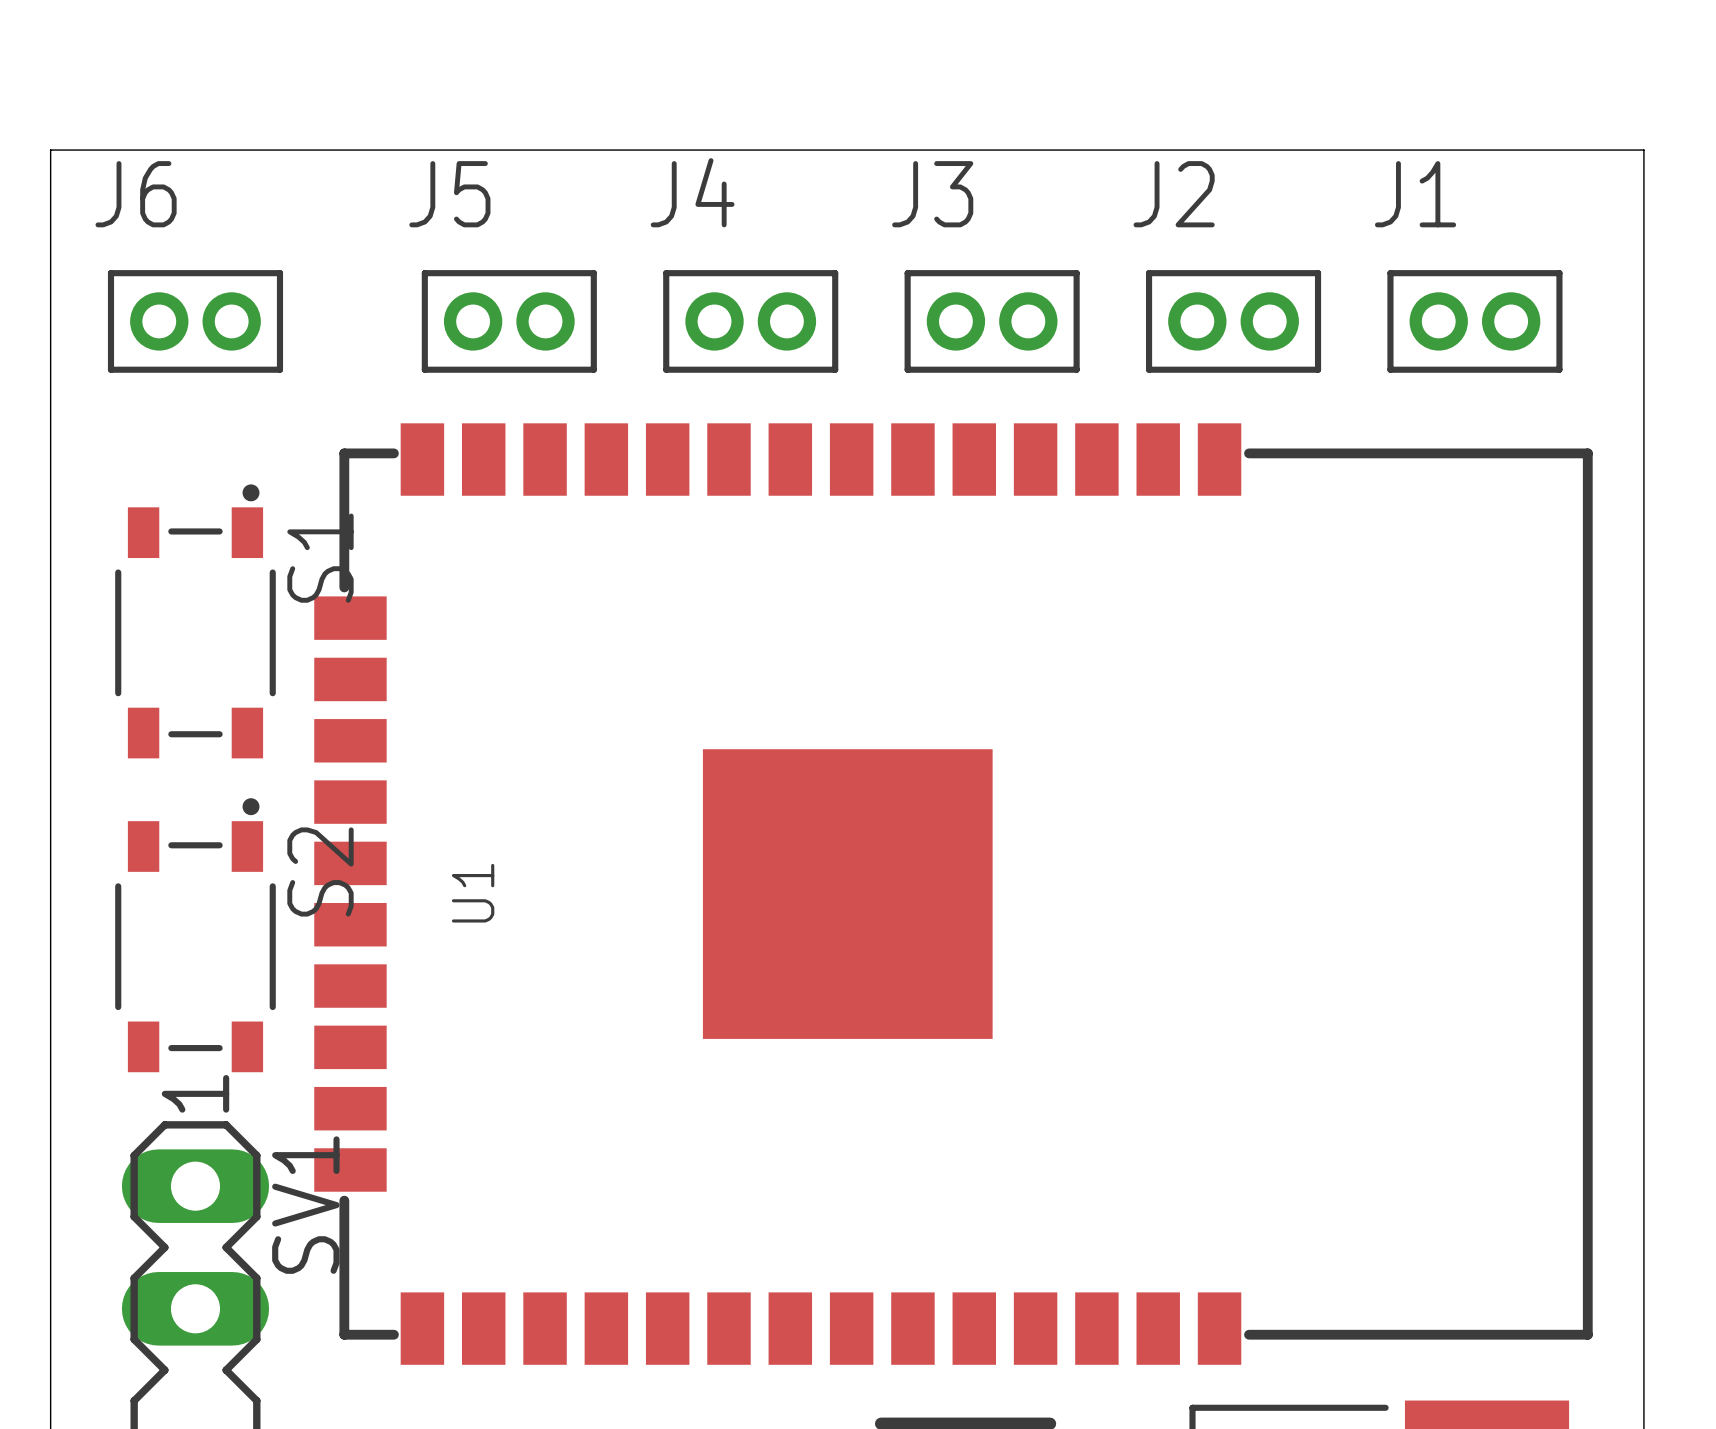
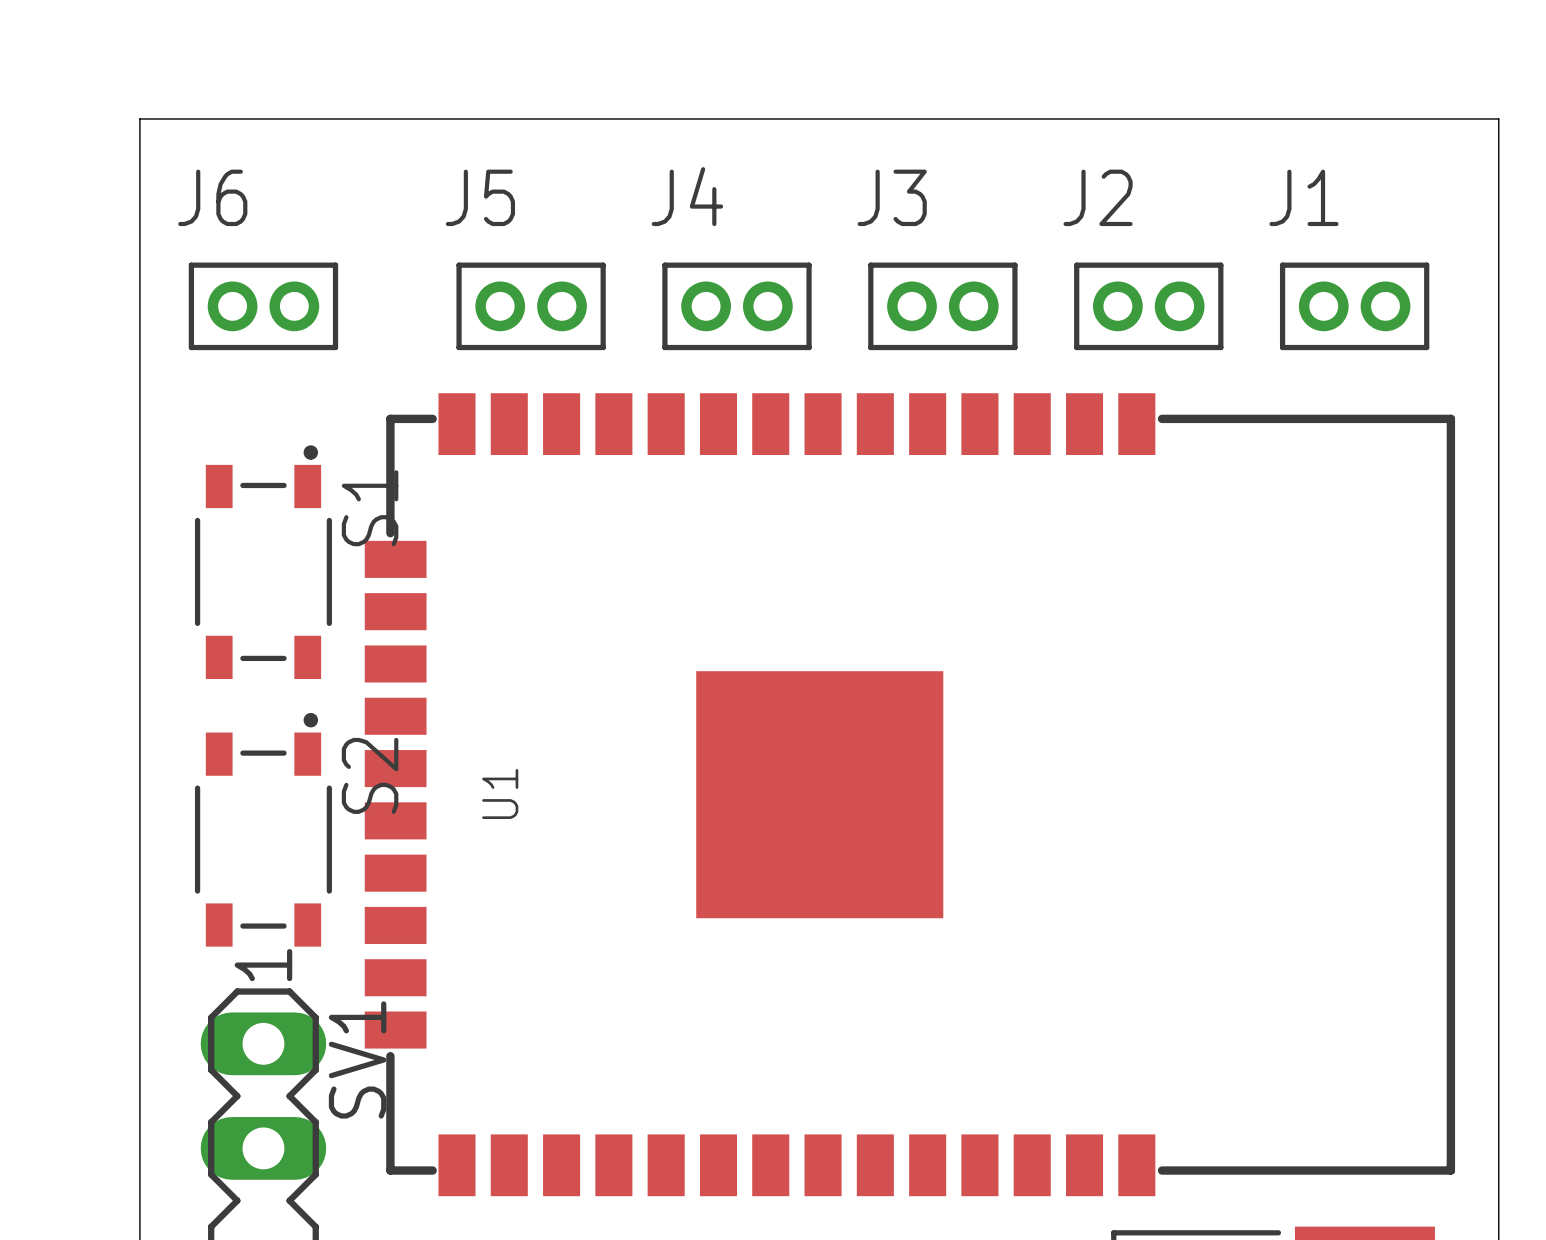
board edge: (50, 150) (1643, 150) -> (139, 160) (139, 118) (1498, 118) (1498, 160)

